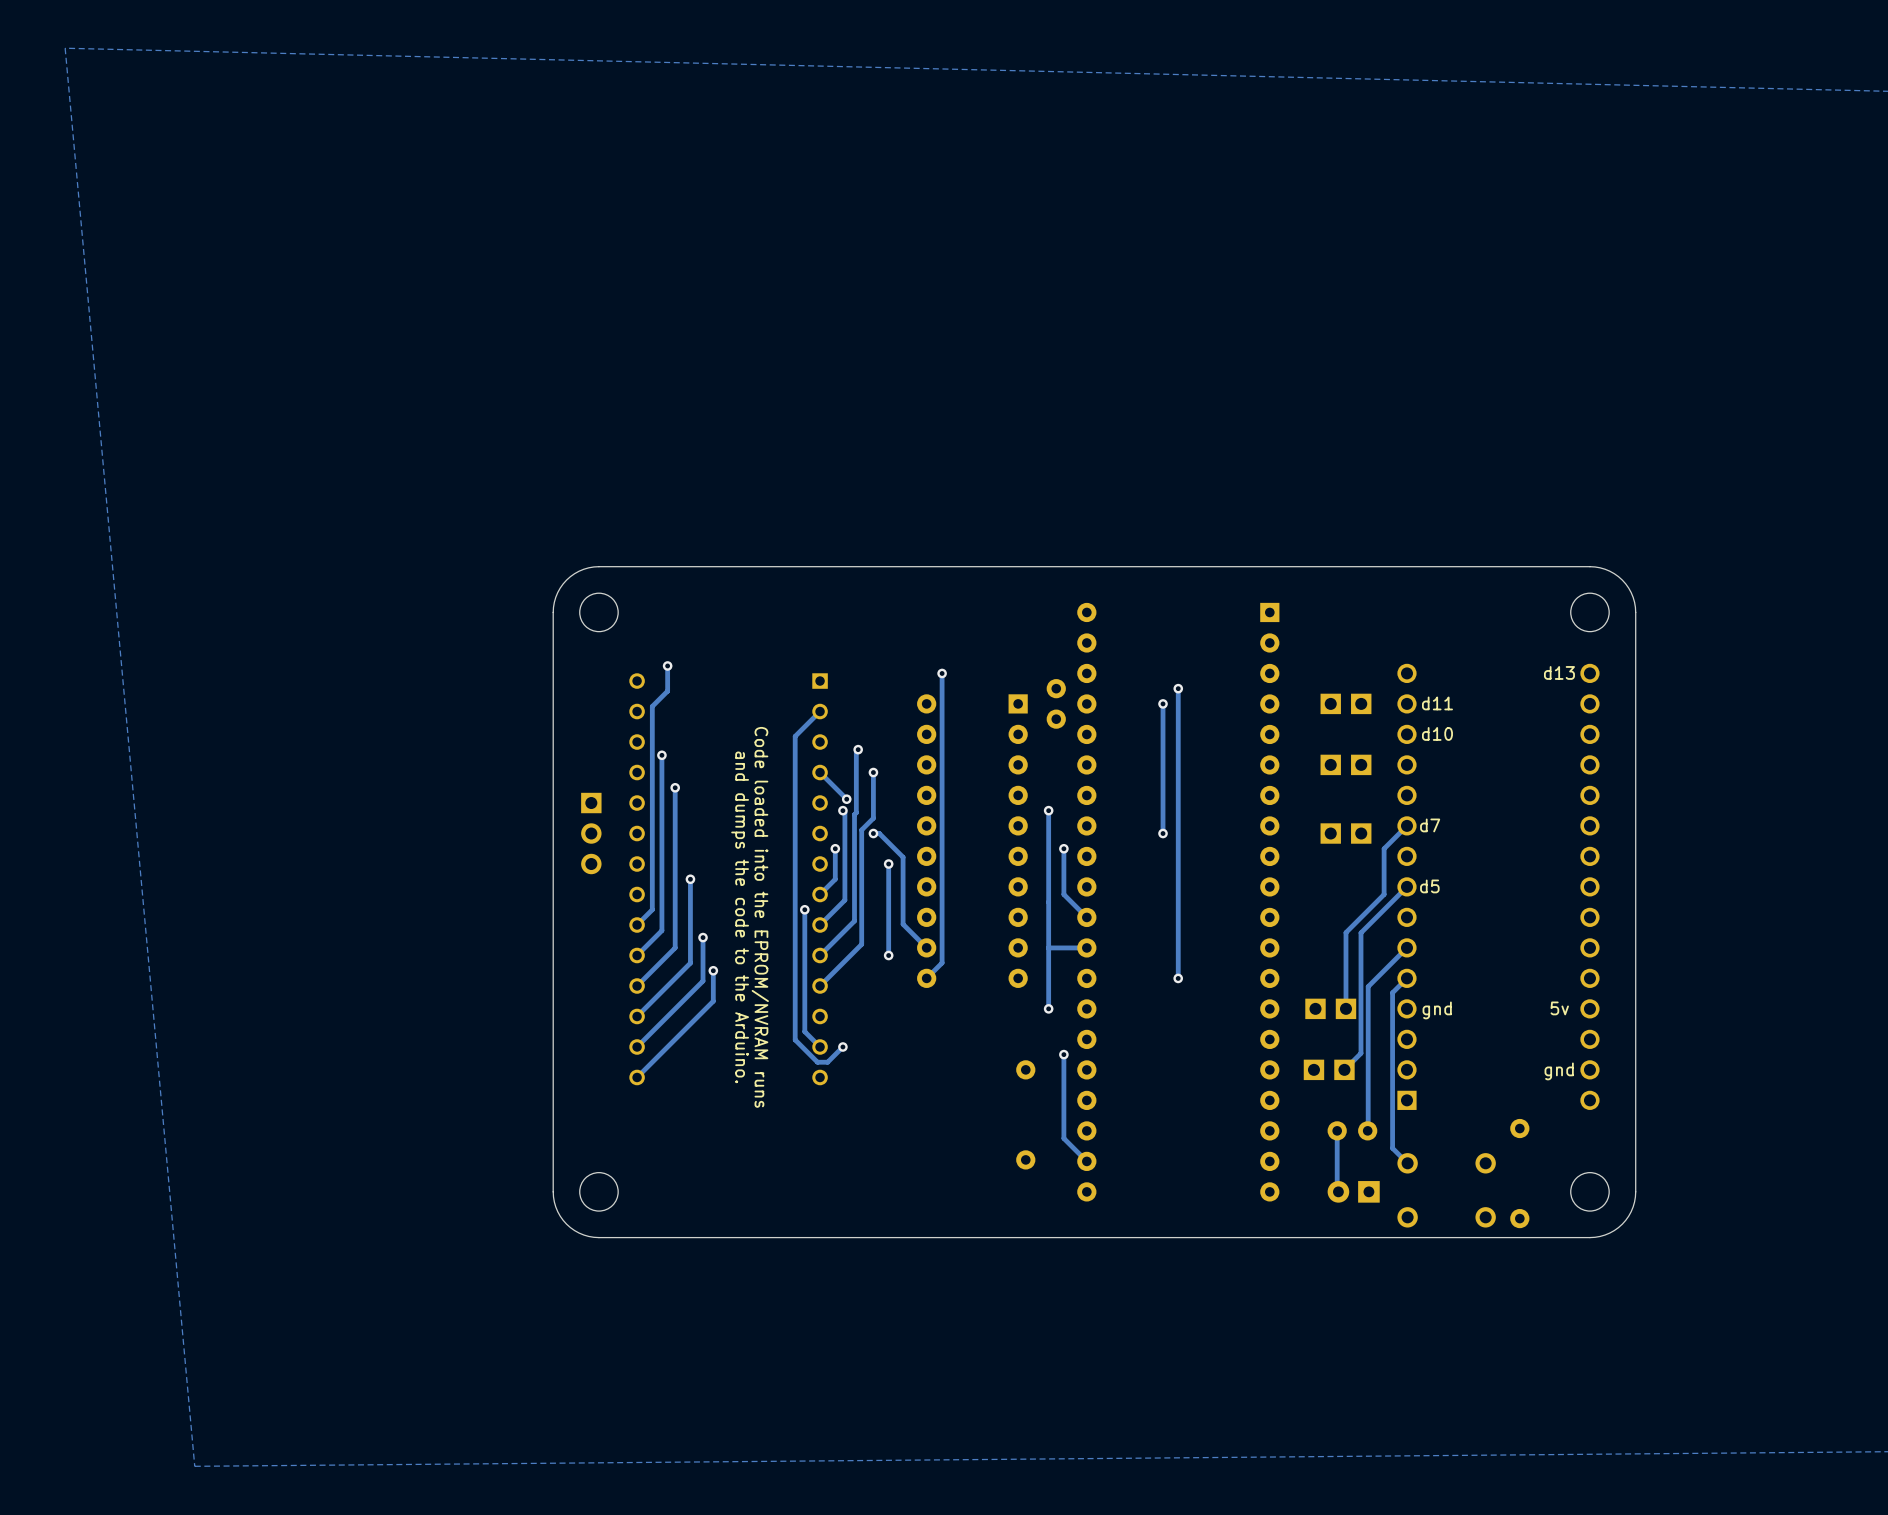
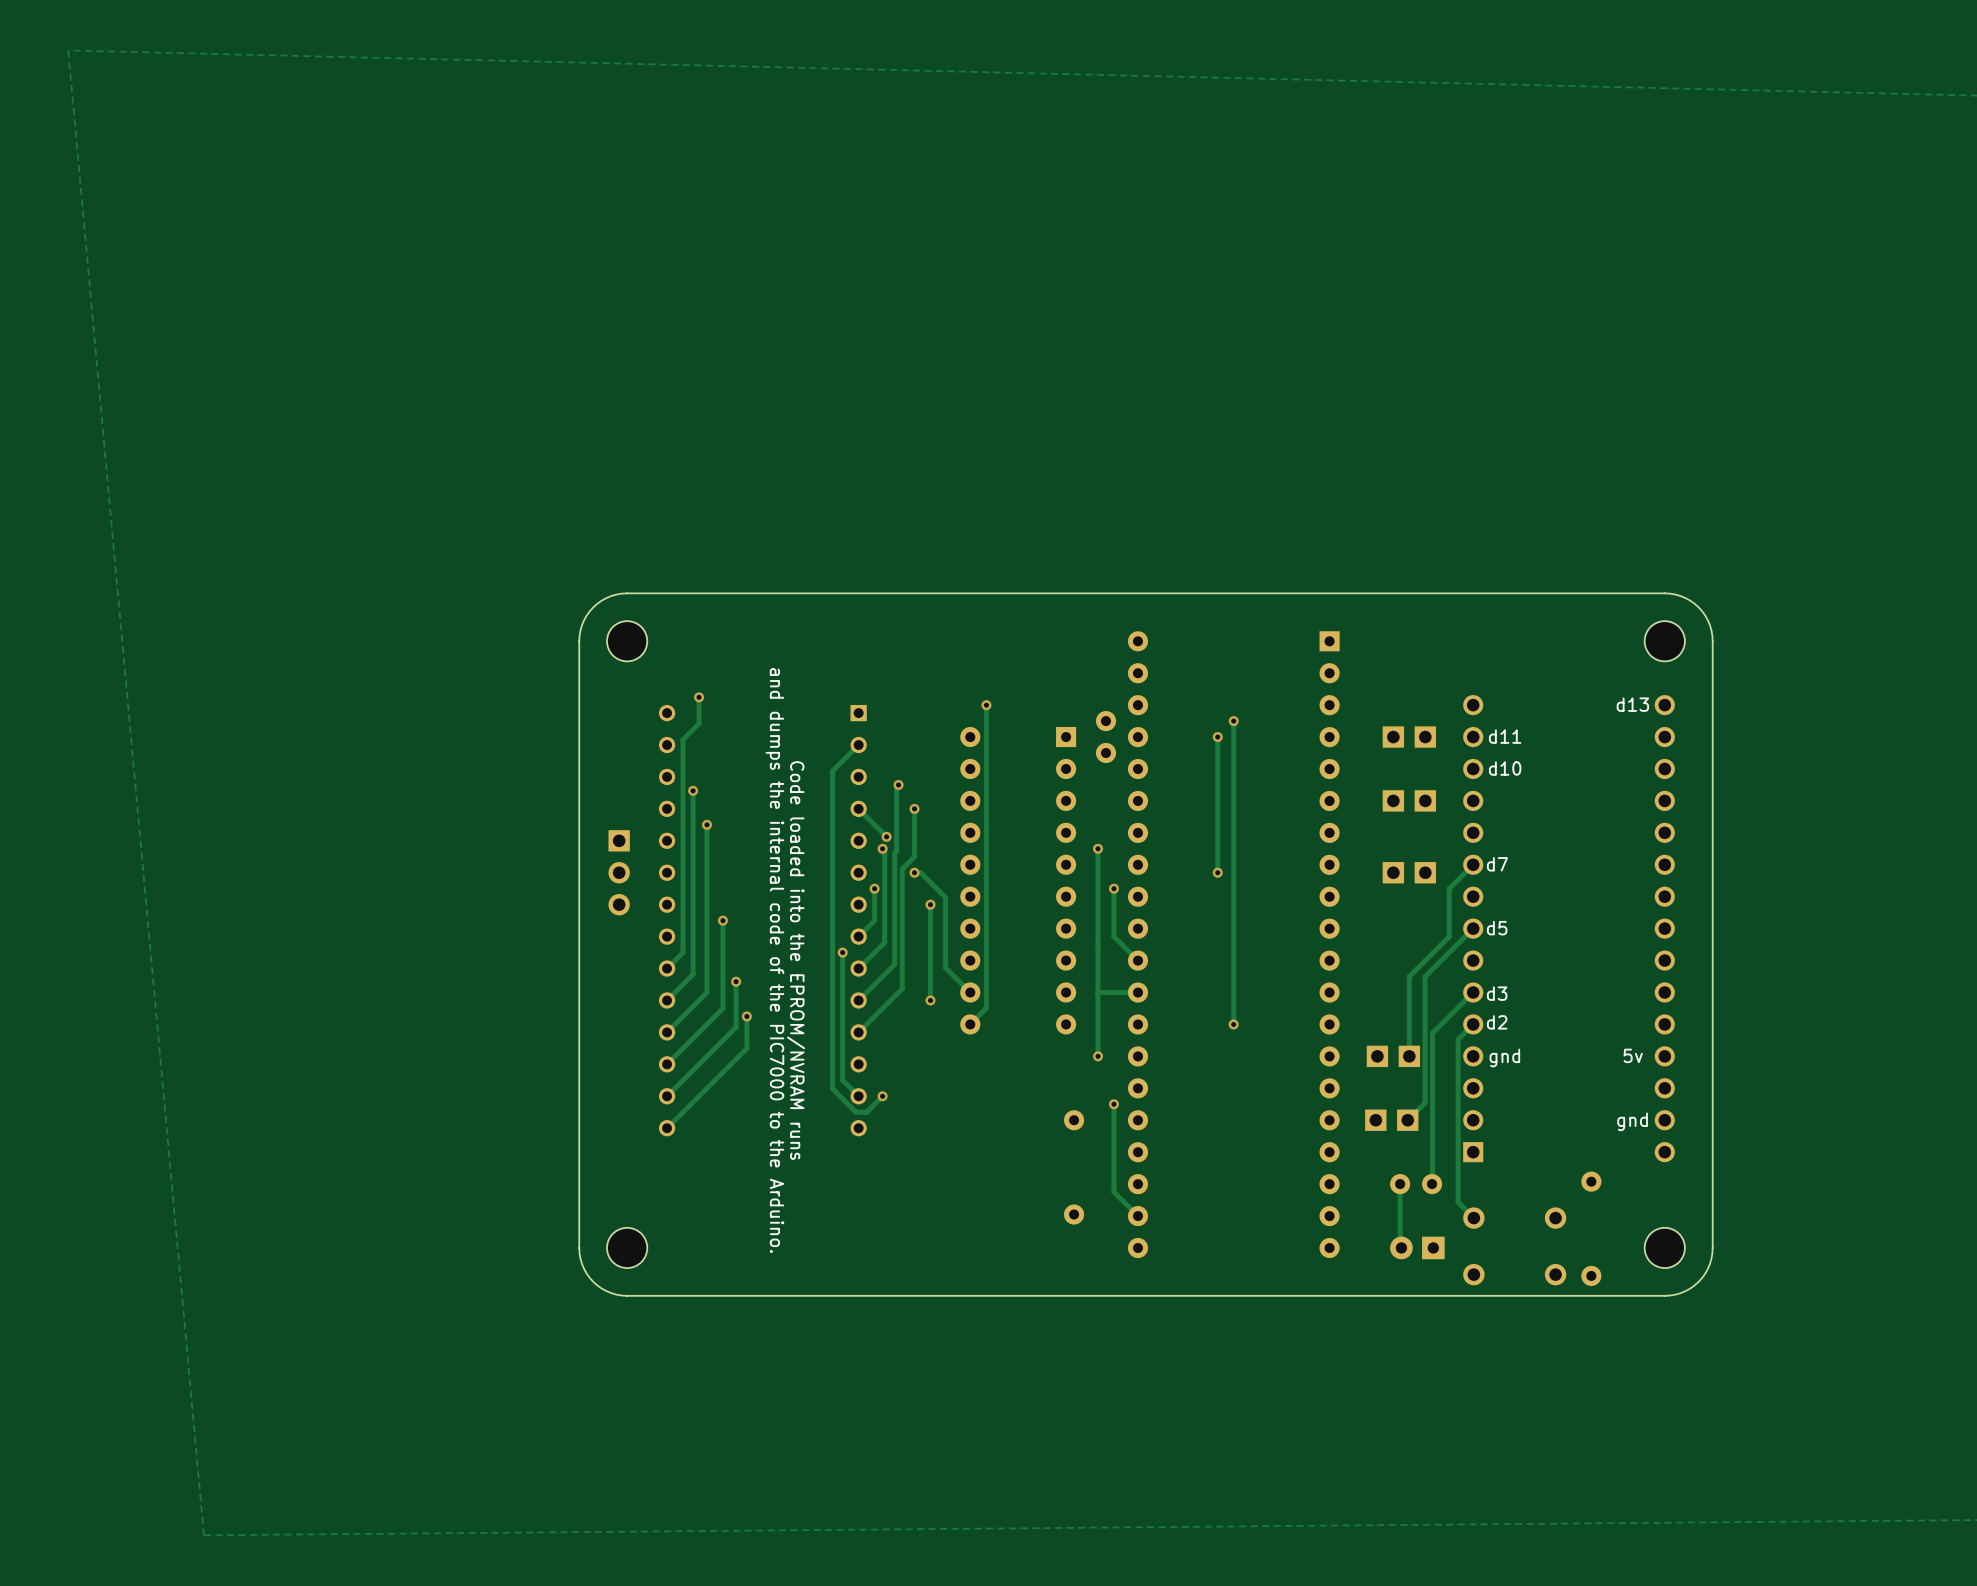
text: and dumps the code to the Arduino. (740, 917) -> and dumps the internal code of the PIC7000 to the Arduino. (774, 960)
text: none -> d3 (1497, 993)
text: none -> d2 (1497, 1022)

